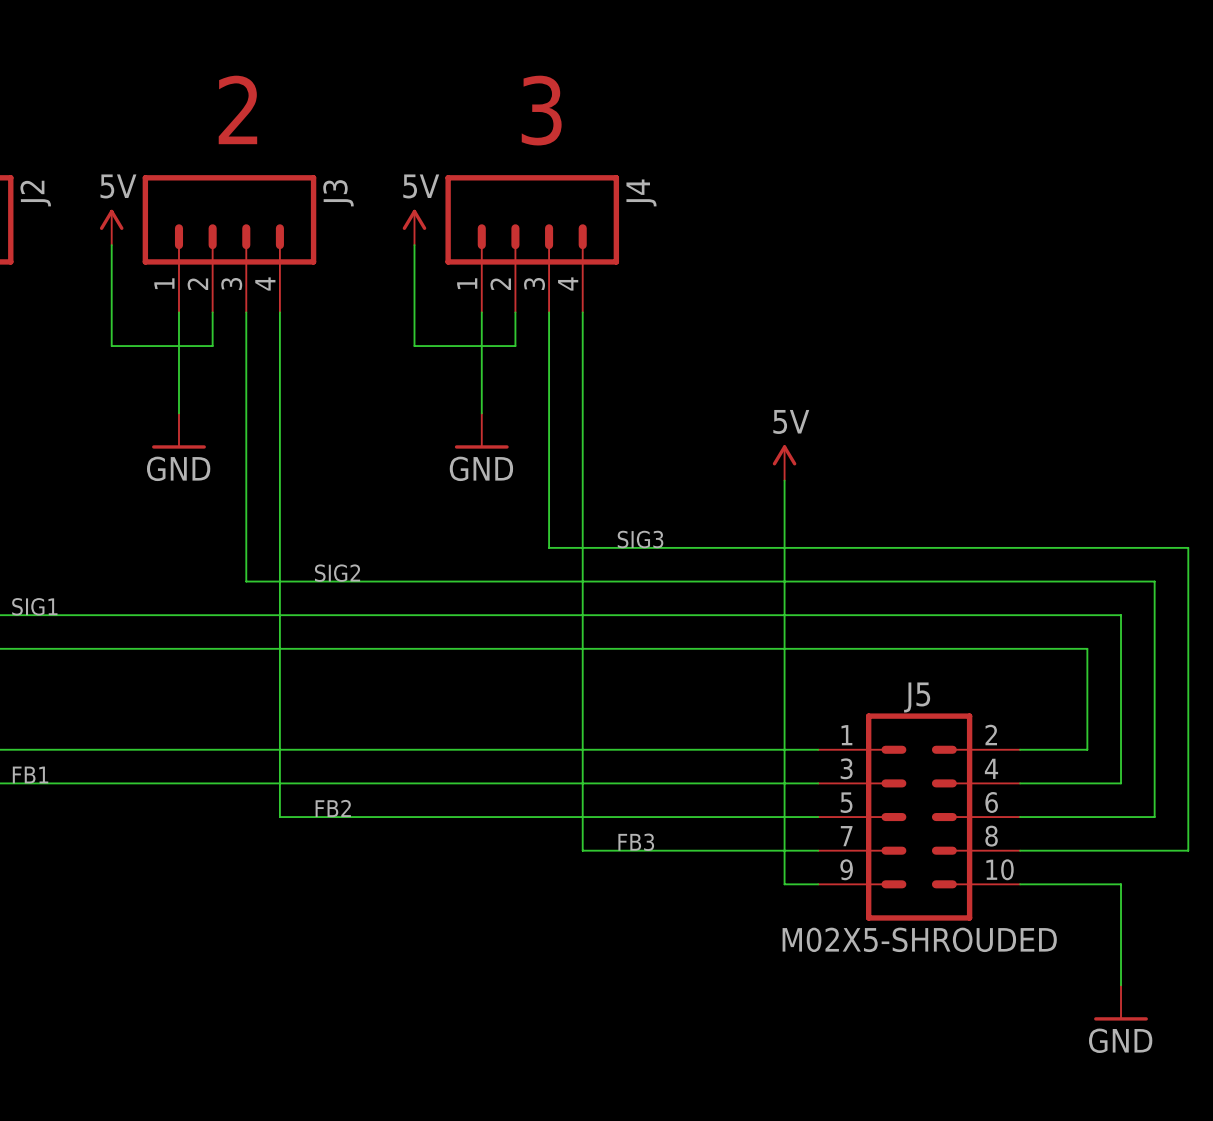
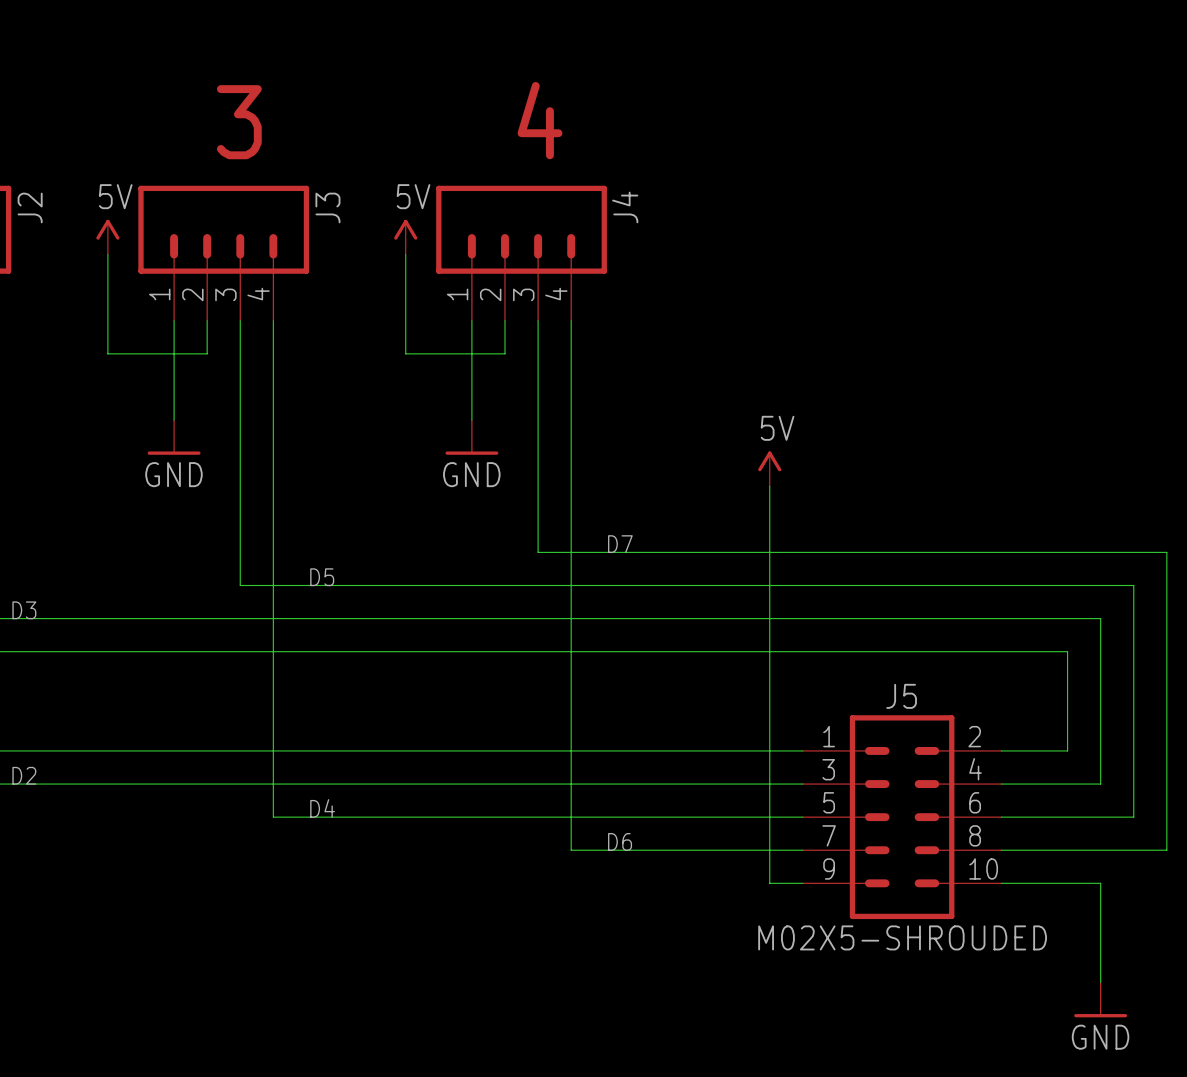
text: 2 (237, 109) -> 3 (239, 122)
text: 3 (541, 110) -> 4 (540, 120)
label: SIG3 (640, 539) -> D7 (620, 544)
label: SIG2 (337, 573) -> D5 (322, 577)
label: SIG1 (34, 606) -> D3 (24, 610)
label: FB1 (30, 774) -> D2 (24, 775)
label: FB2 (333, 808) -> D4 (322, 808)
label: FB3 (636, 842) -> D6 (620, 841)

